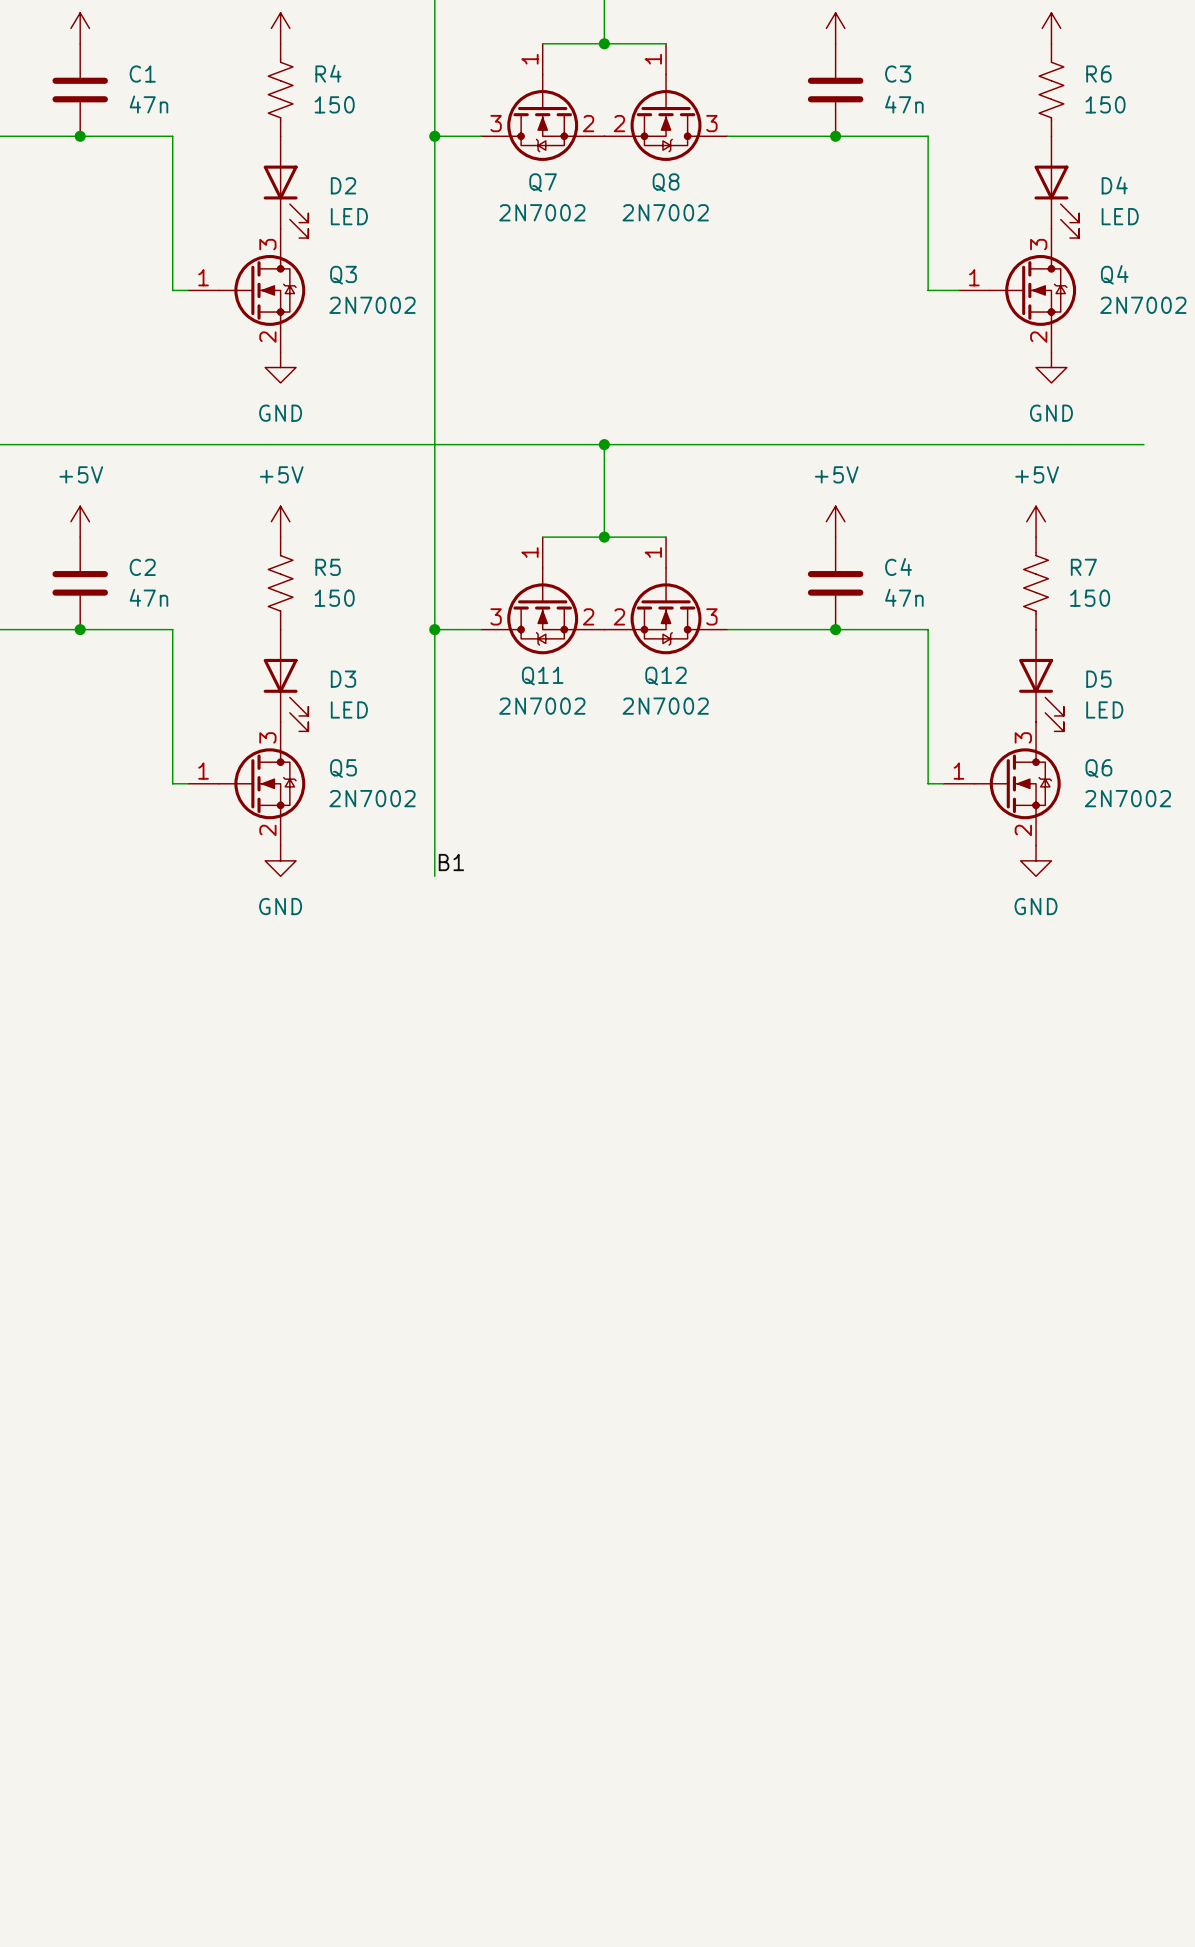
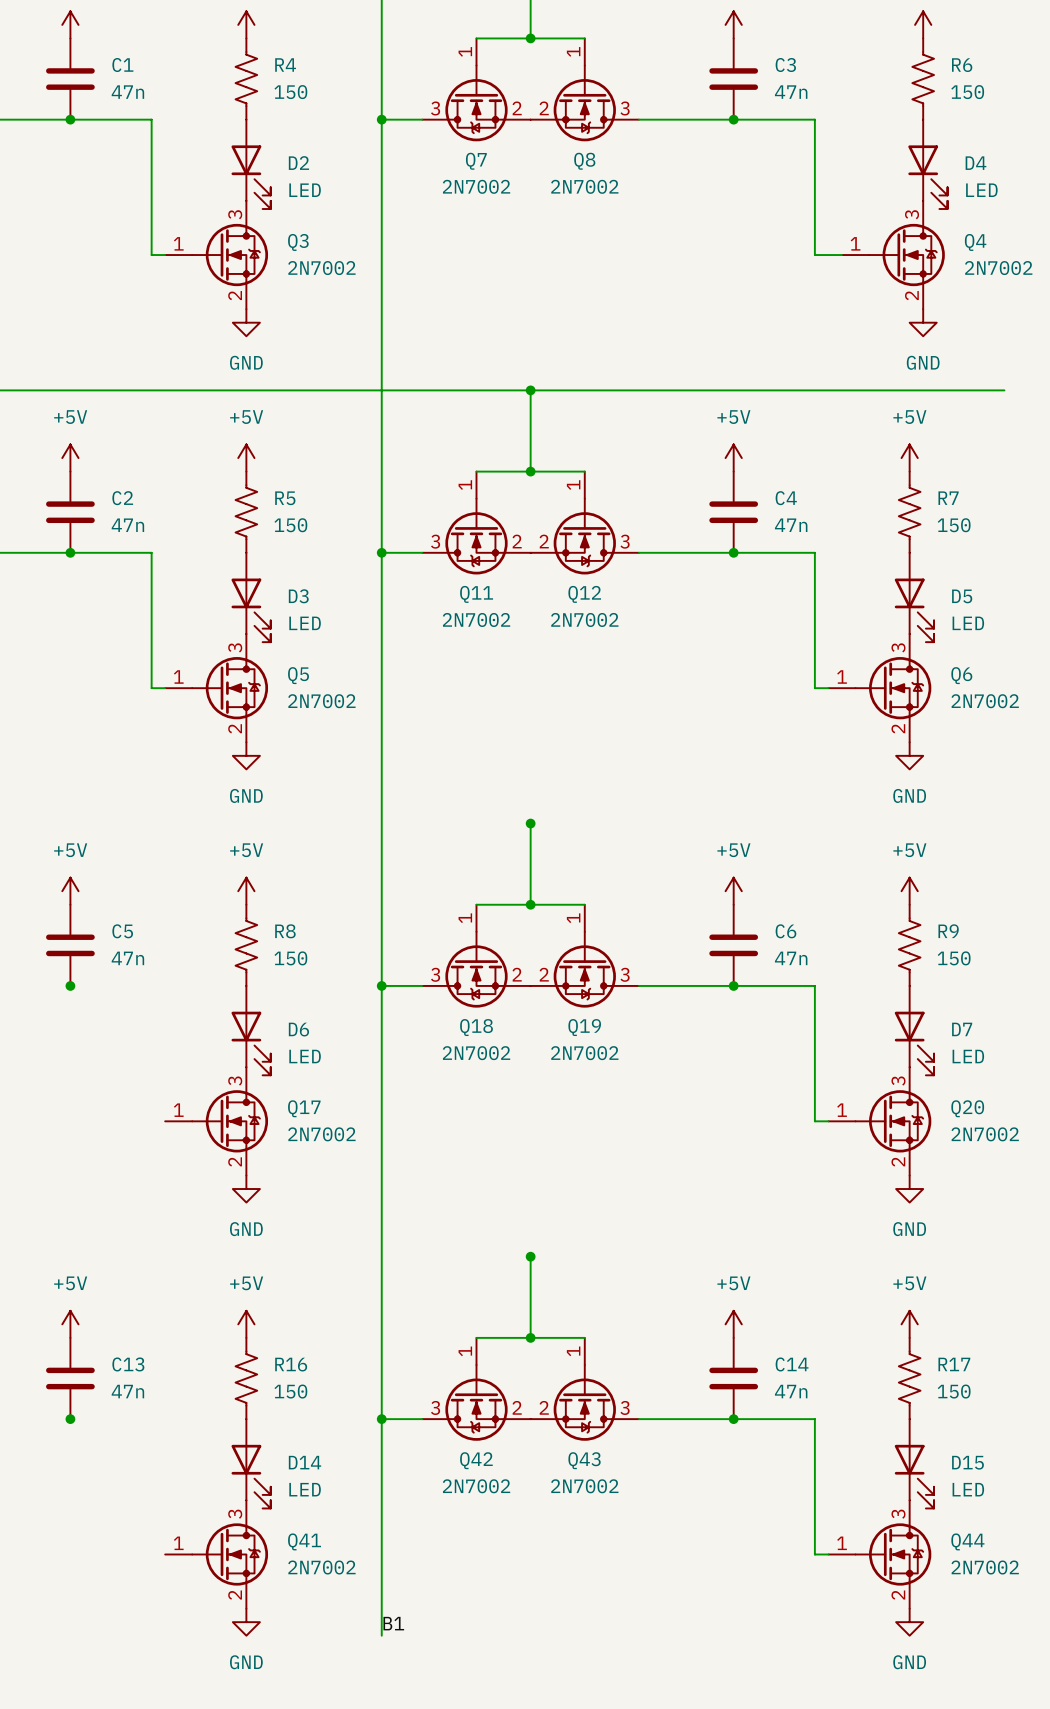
label: B1 (451, 862) -> none
wire: none -> (381, 769) (381, 1635)
wire: none -> (530, 823) (530, 904)
junction: none -> (530, 823)
power symbol: none -> +5V (70, 891)
power symbol: none -> +5V (246, 891)
power symbol: none -> +5V (733, 891)
power symbol: none -> +5V (909, 891)
wire: none -> (476, 904) (584, 904)
junction: none -> (530, 904)
C5: none -> 47n (70, 945)
R8: none -> 150 (246, 945)
C6: none -> 47n (733, 945)
R9: none -> 150 (909, 945)
Q18: none -> 2N7002 (476, 956)
Q19: none -> 2N7002 (584, 956)
junction: none -> (70, 985)
wire: none -> (381, 985) (422, 985)
junction: none -> (381, 985)
wire: none -> (638, 985) (814, 985) (814, 1121) (828, 1121)
junction: none -> (733, 985)
D6: none -> LED (251, 1030)
D7: none -> LED (914, 1030)
Q17: none -> 2N7002 (216, 1121)
Q20: none -> 2N7002 (879, 1121)
power symbol: none -> GND (246, 1189)
power symbol: none -> GND (909, 1189)
wire: none -> (530, 1256) (530, 1337)
junction: none -> (530, 1256)
power symbol: none -> +5V (70, 1324)
power symbol: none -> +5V (246, 1324)
power symbol: none -> +5V (733, 1324)
power symbol: none -> +5V (909, 1324)
wire: none -> (476, 1337) (584, 1337)
junction: none -> (530, 1337)
C13: none -> 47n (70, 1378)
R16: none -> 150 (246, 1378)
C14: none -> 47n (733, 1378)
R17: none -> 150 (909, 1378)
Q42: none -> 2N7002 (476, 1389)
Q43: none -> 2N7002 (584, 1389)
junction: none -> (70, 1419)
wire: none -> (381, 1419) (422, 1419)
junction: none -> (381, 1419)
wire: none -> (638, 1419) (814, 1419) (814, 1554) (828, 1554)
junction: none -> (733, 1419)
D14: none -> LED (251, 1463)
D15: none -> LED (914, 1463)
Q41: none -> 2N7002 (216, 1554)
Q44: none -> 2N7002 (879, 1554)
power symbol: none -> GND (246, 1622)
power symbol: none -> GND (909, 1622)
label: none -> B1 (393, 1623)

